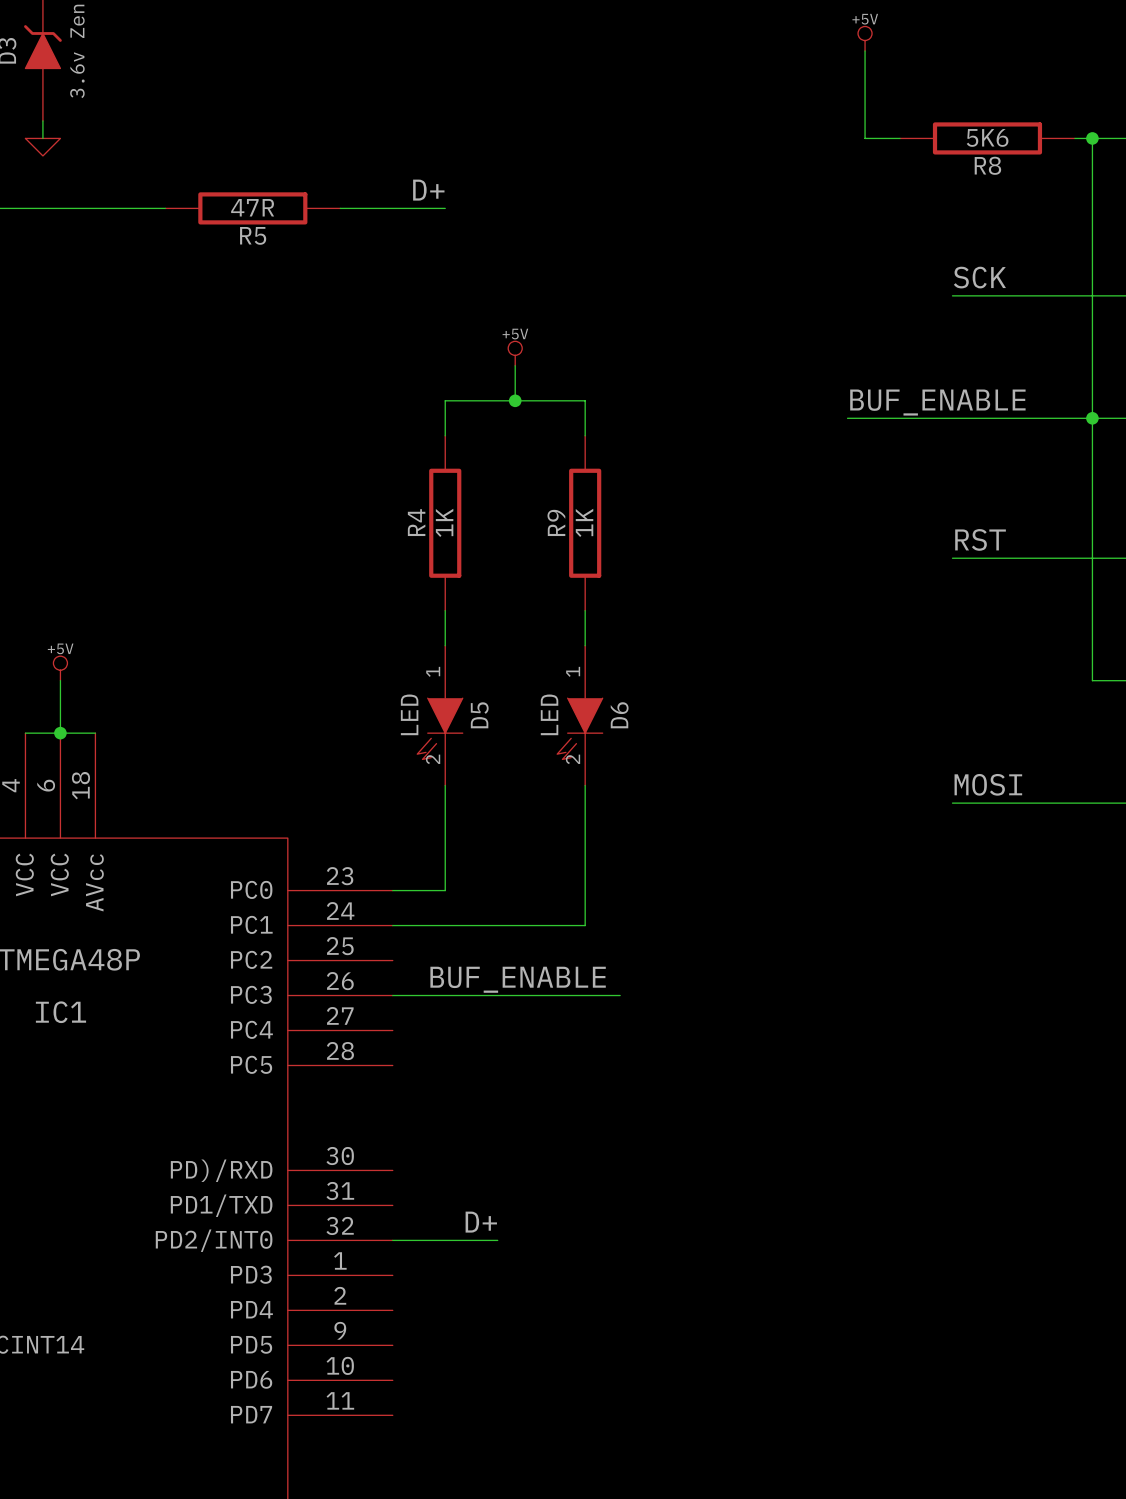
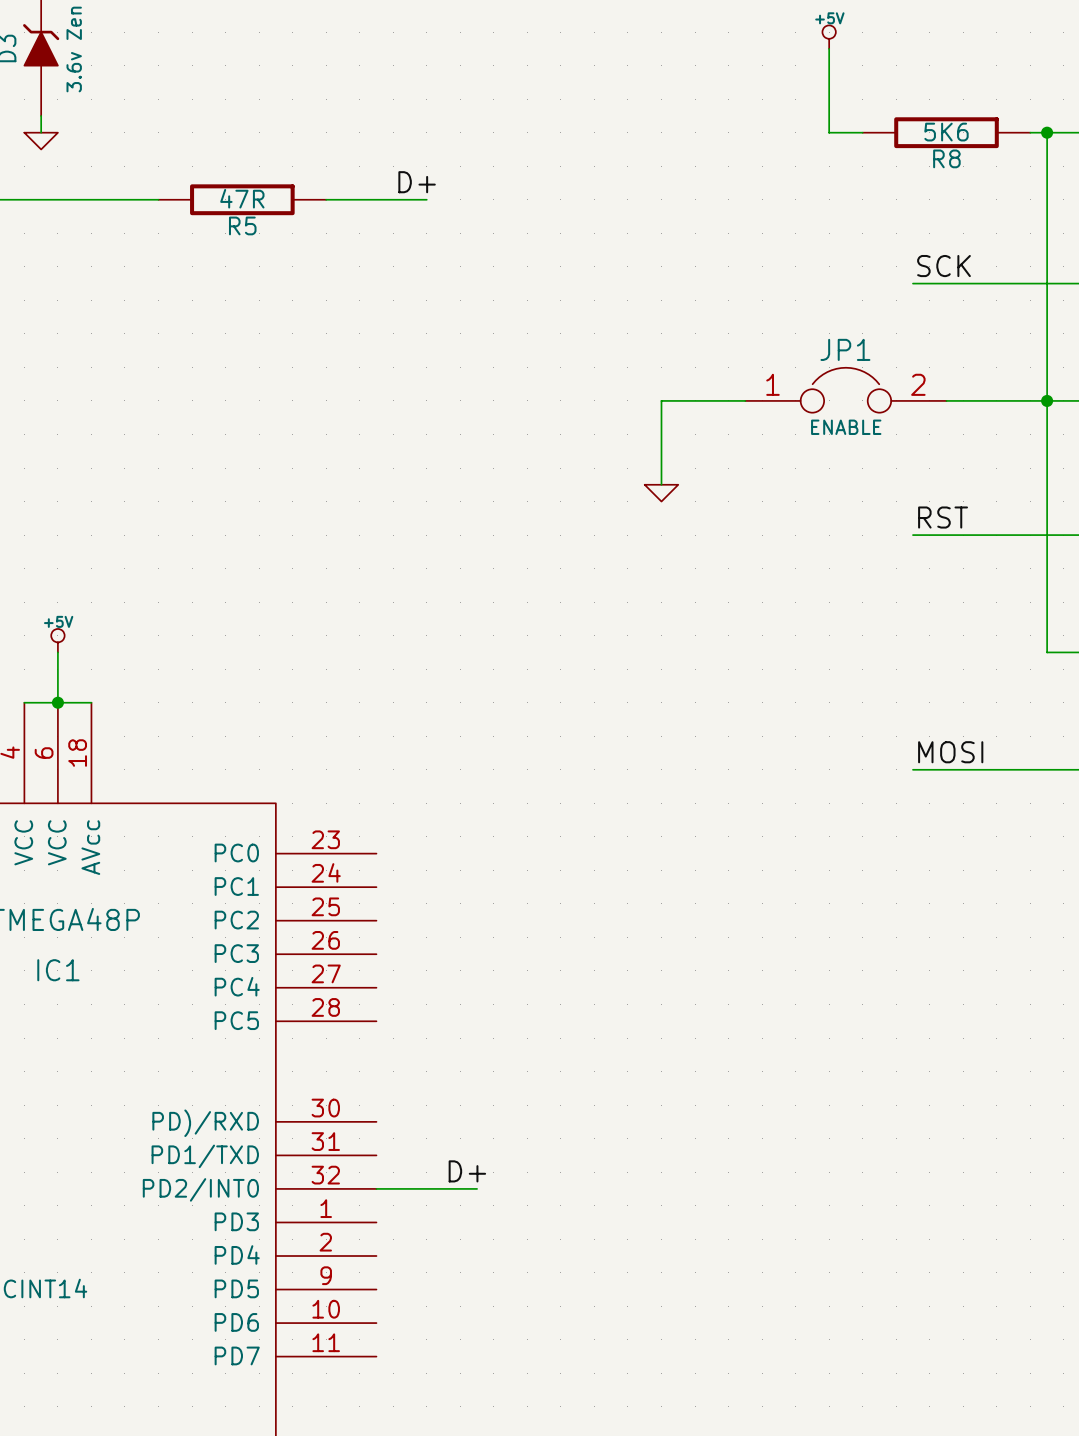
power symbol: +5V (515, 353) -> none
wire: (515, 365) (515, 400) -> none
junction: (515, 400) -> none
label: BUF_ENABLE (937, 402) -> none
JP1: none -> ENABLE (845, 390)
wire: none -> (745, 400) (661, 400) (661, 484)
wire: (847, 418) (987, 418) -> none
wire: (445, 435) (445, 400) (585, 400) (585, 435) -> none
power symbol: none -> (661, 493)
R4: 1K (445, 523) -> none
R9: 1K (585, 523) -> none
wire: (445, 610) (445, 645) -> none
wire: (585, 610) (585, 645) -> none
D5: LED (440, 715) -> none
D6: LED (579, 715) -> none
wire: (445, 785) (445, 890) (392, 890) -> none
wire: (585, 785) (585, 925) (392, 925) -> none
label: BUF_ENABLE (518, 979) -> none
wire: (392, 995) (620, 995) -> none

